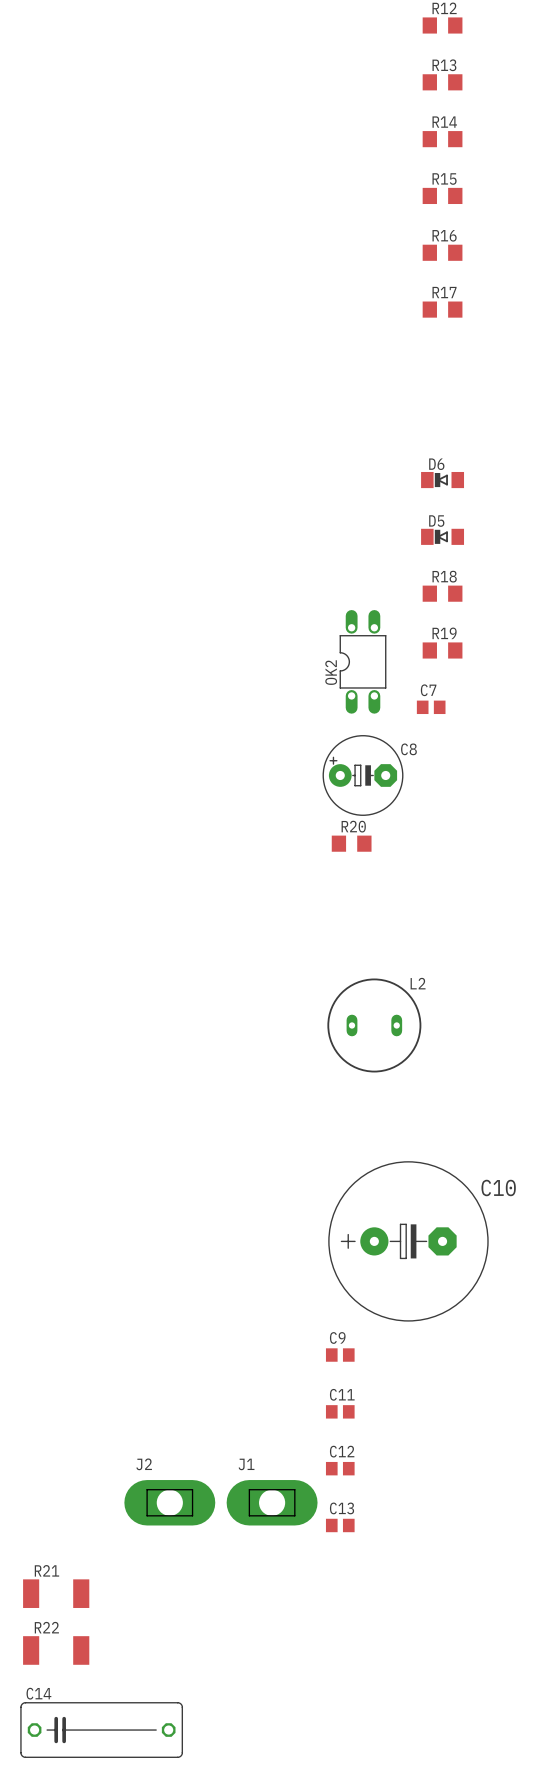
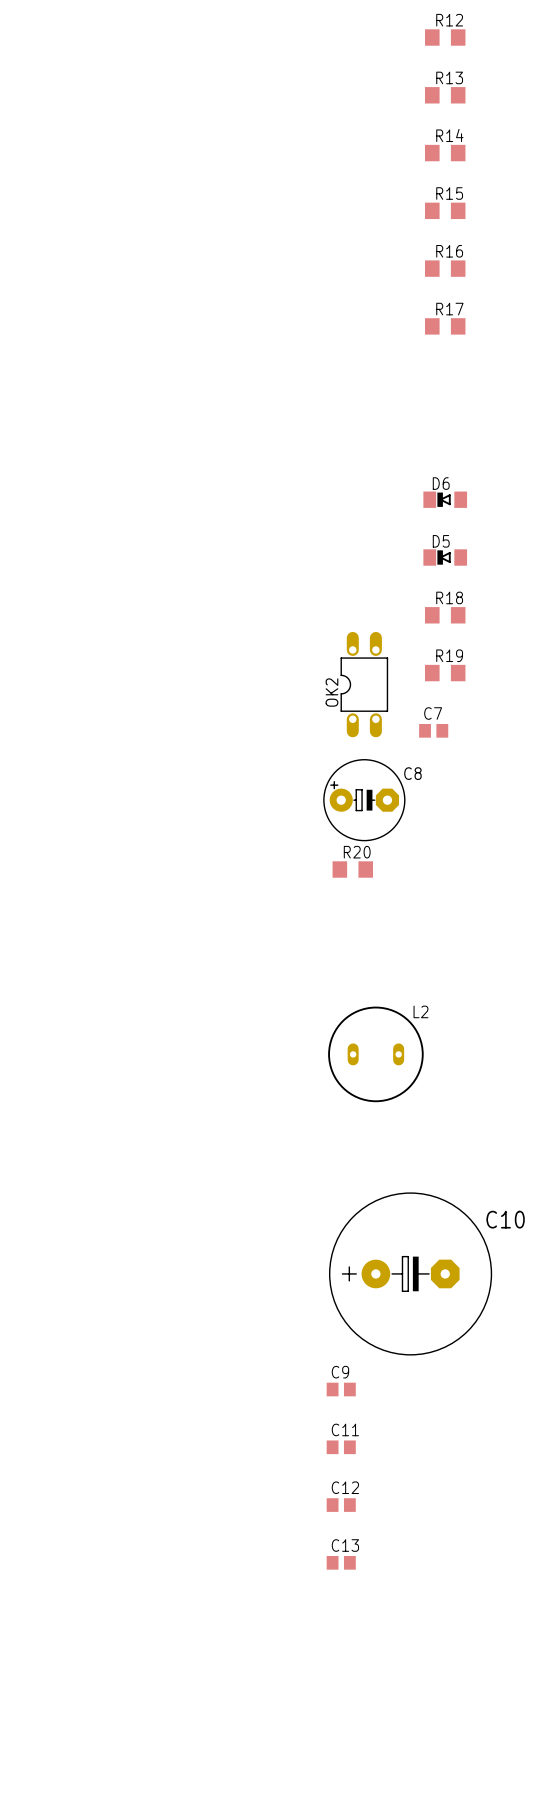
J2: (169, 1502) -> none
J1: (272, 1502) -> none
R21: (56, 1593) -> none
R22: (56, 1650) -> none
C14: (101, 1730) -> none

